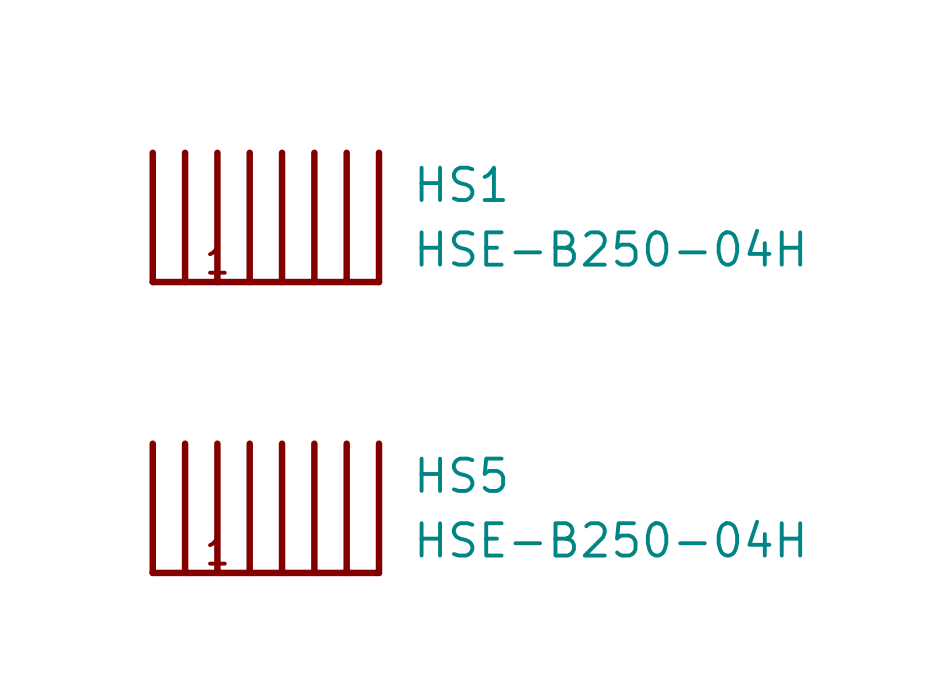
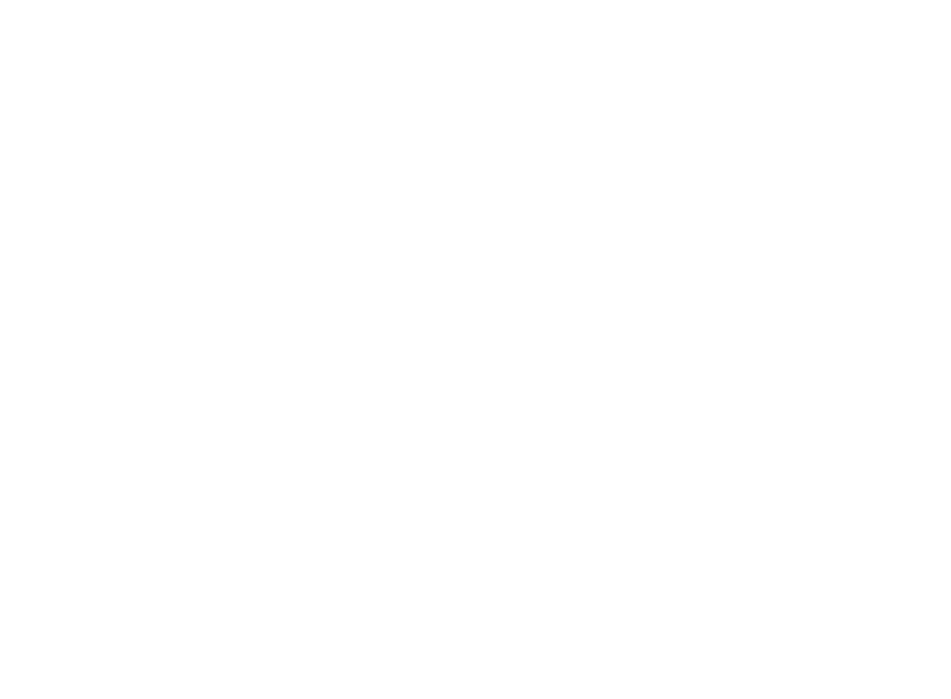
HS1: HSE-B250-04H (265, 217) -> none
HS5: HSE-B250-04H (265, 508) -> none

